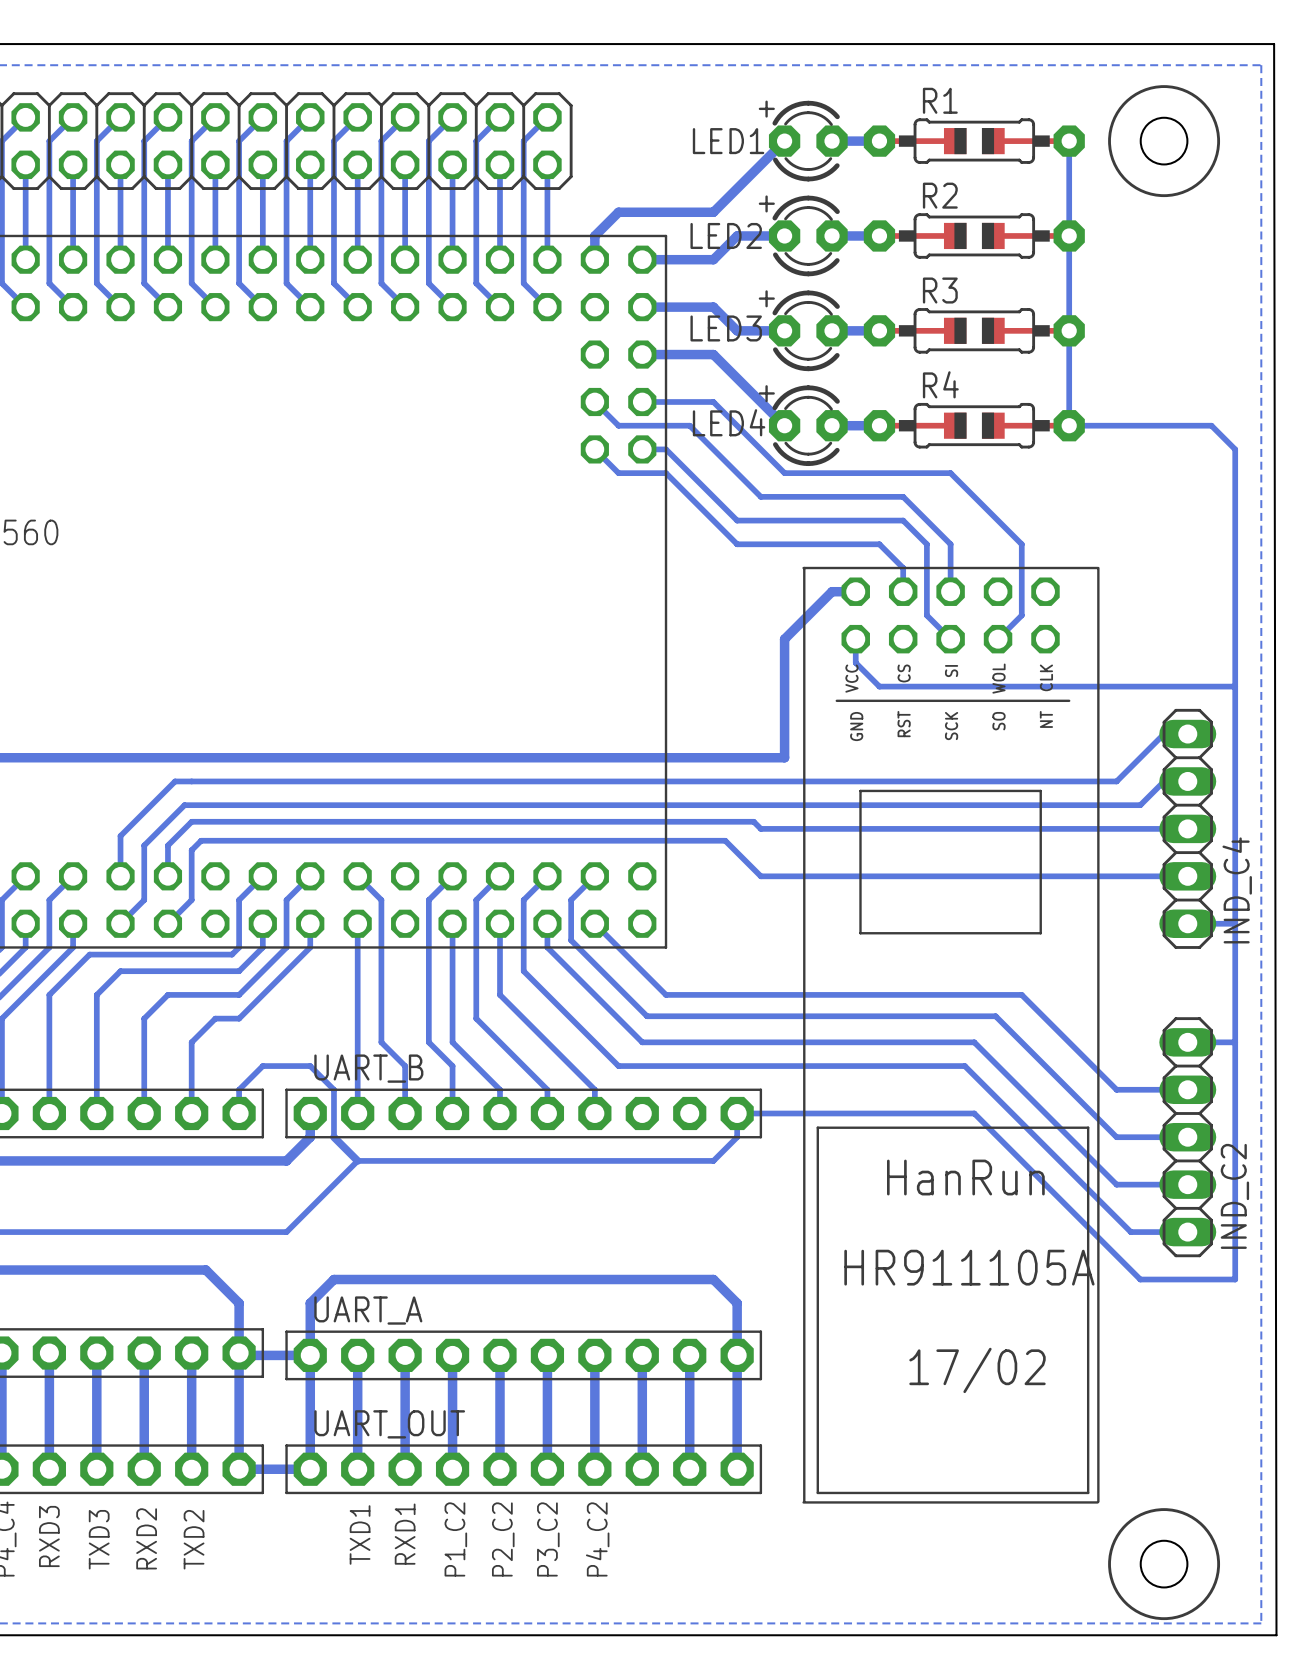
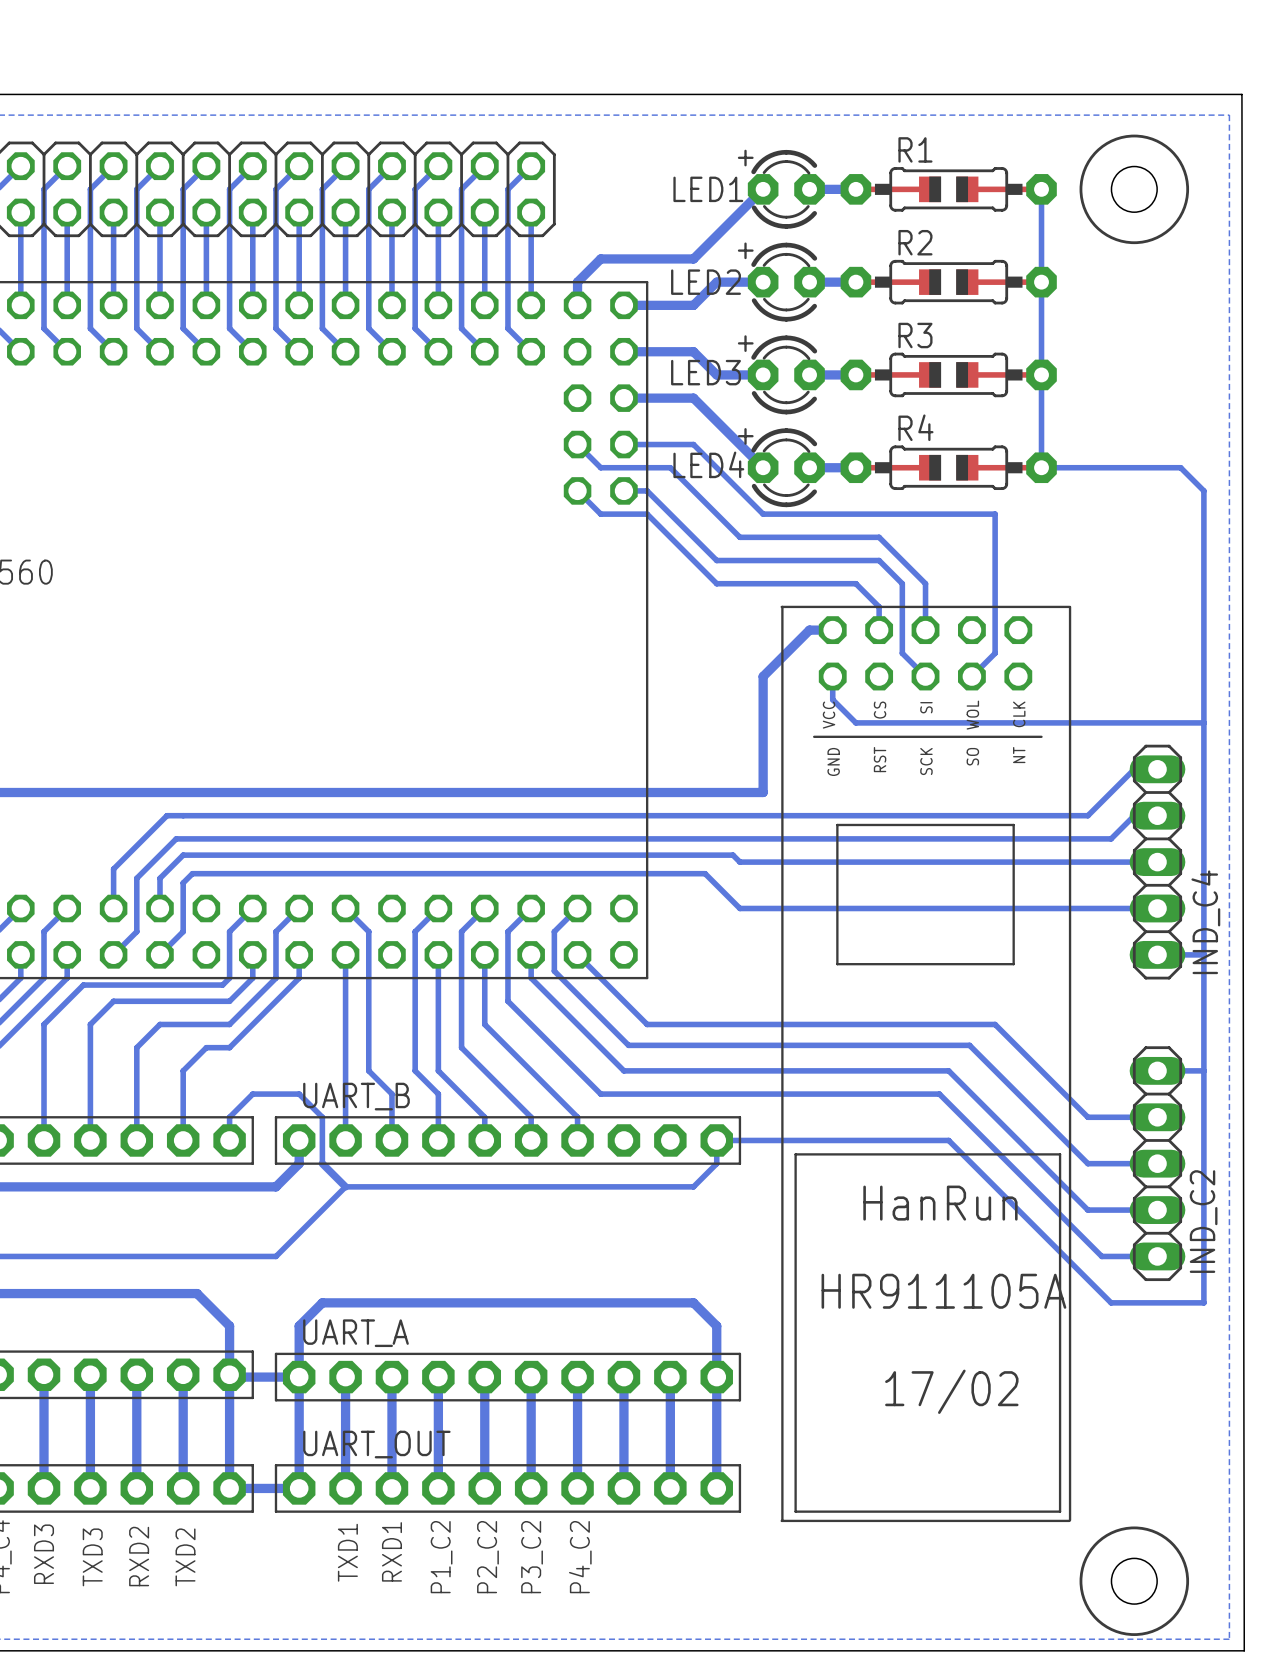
bottom track: (950, 473) (1021, 544) -> (925, 514) (995, 514) (995, 583)

